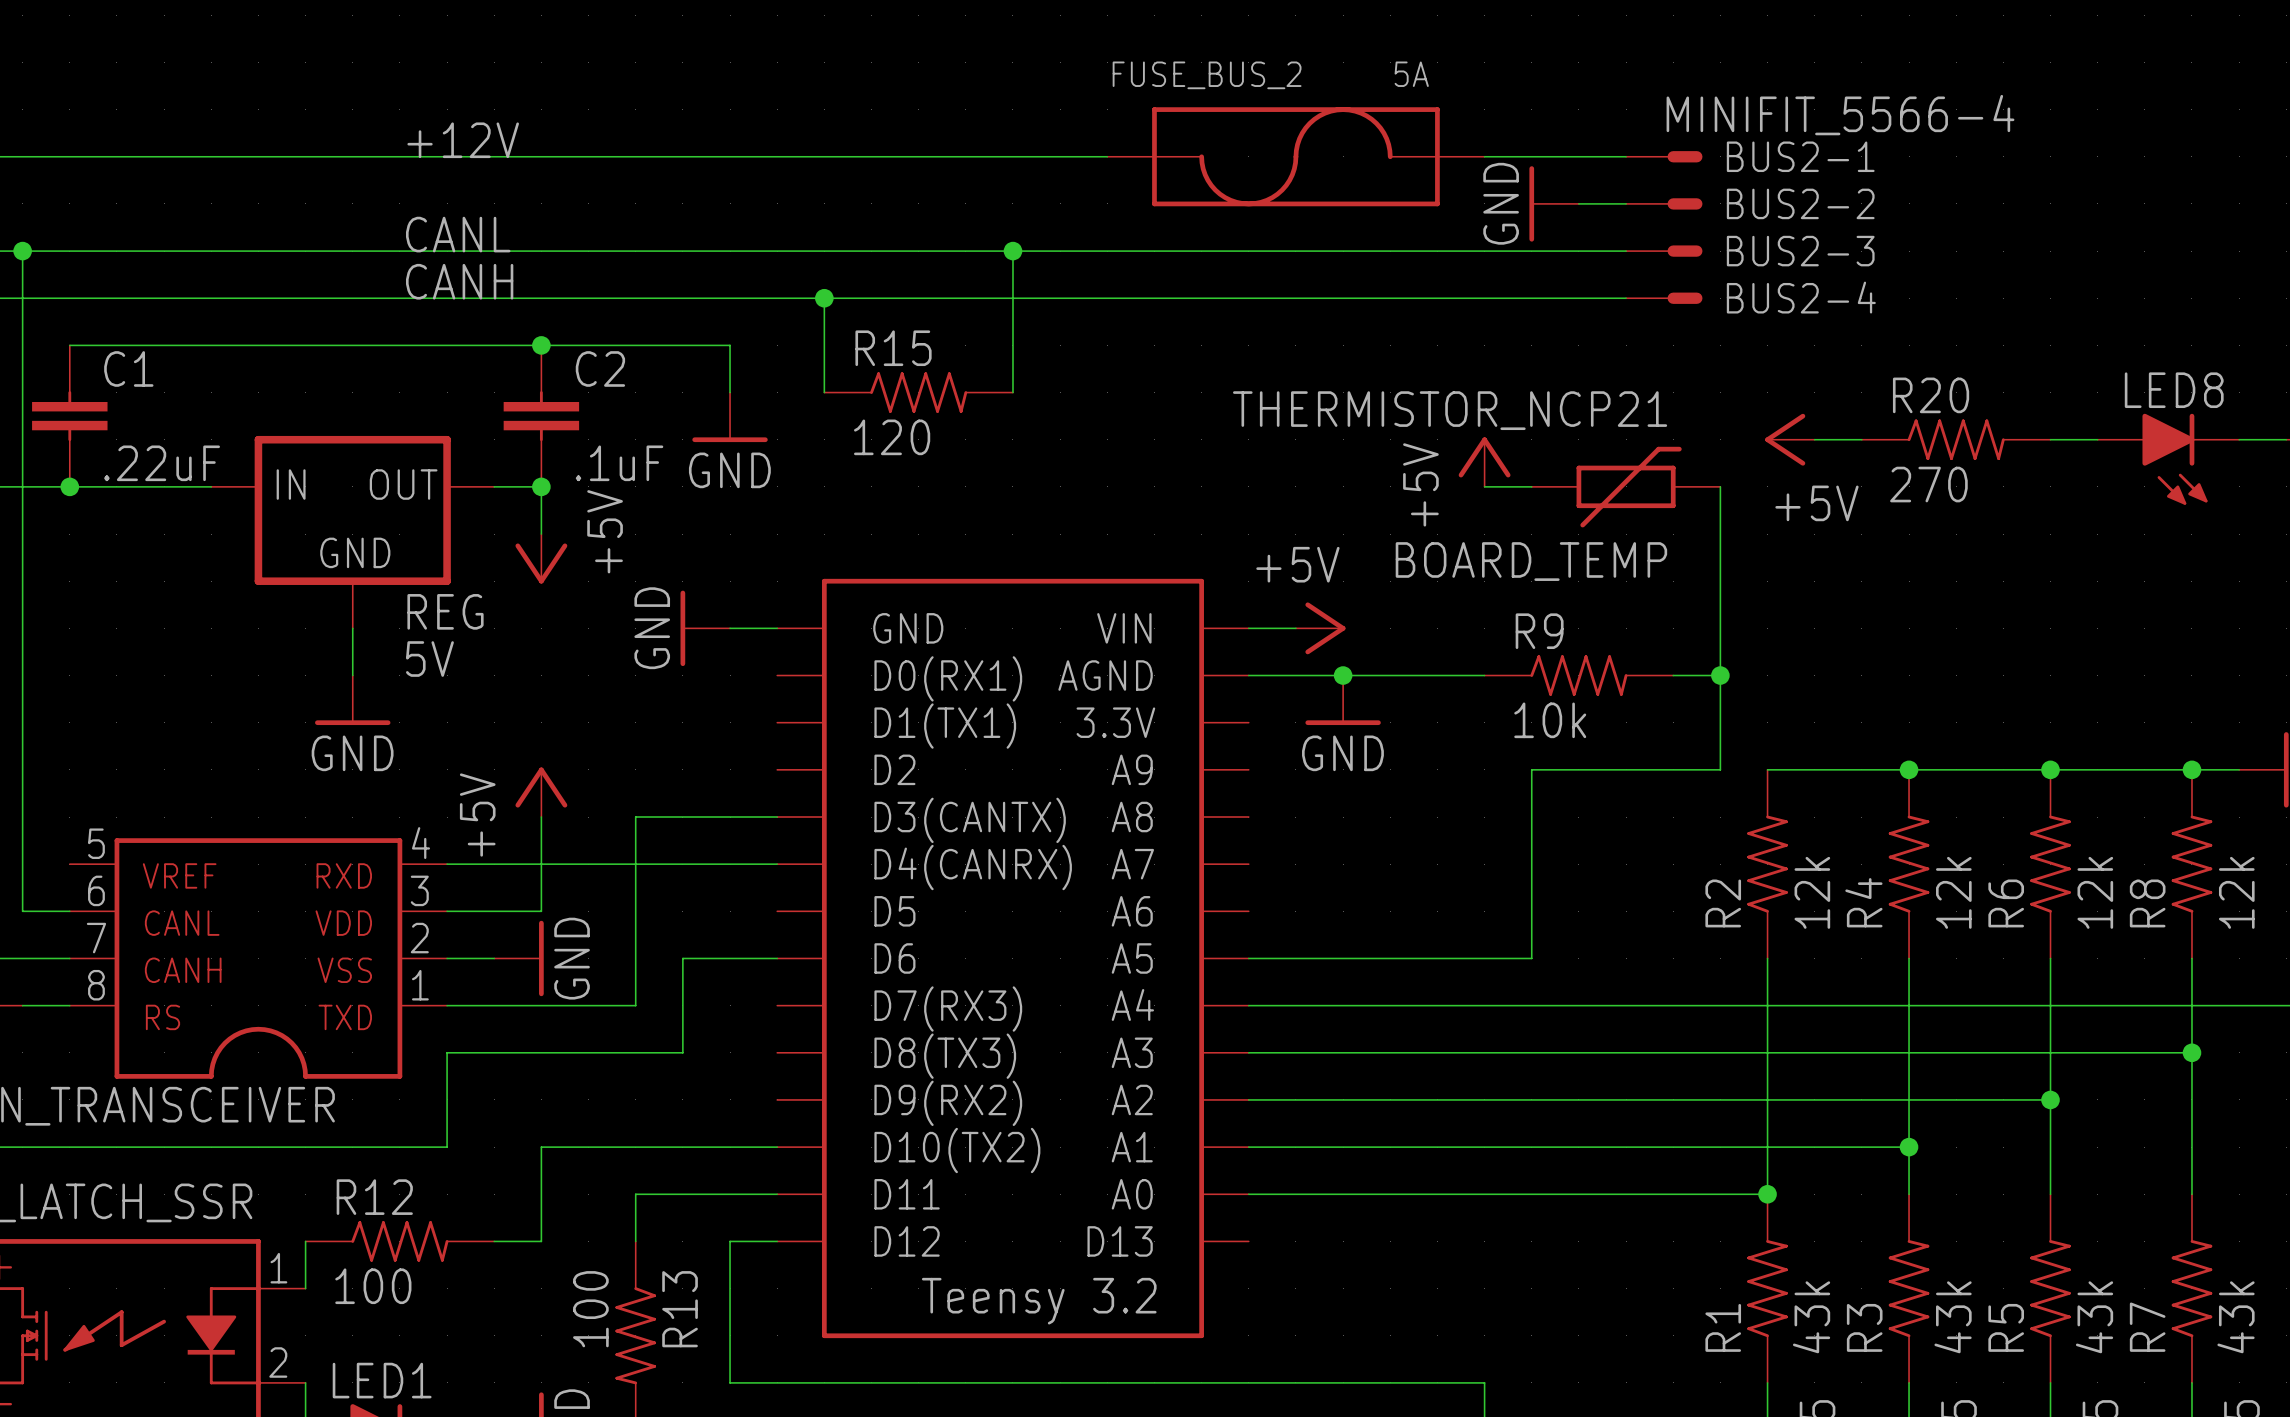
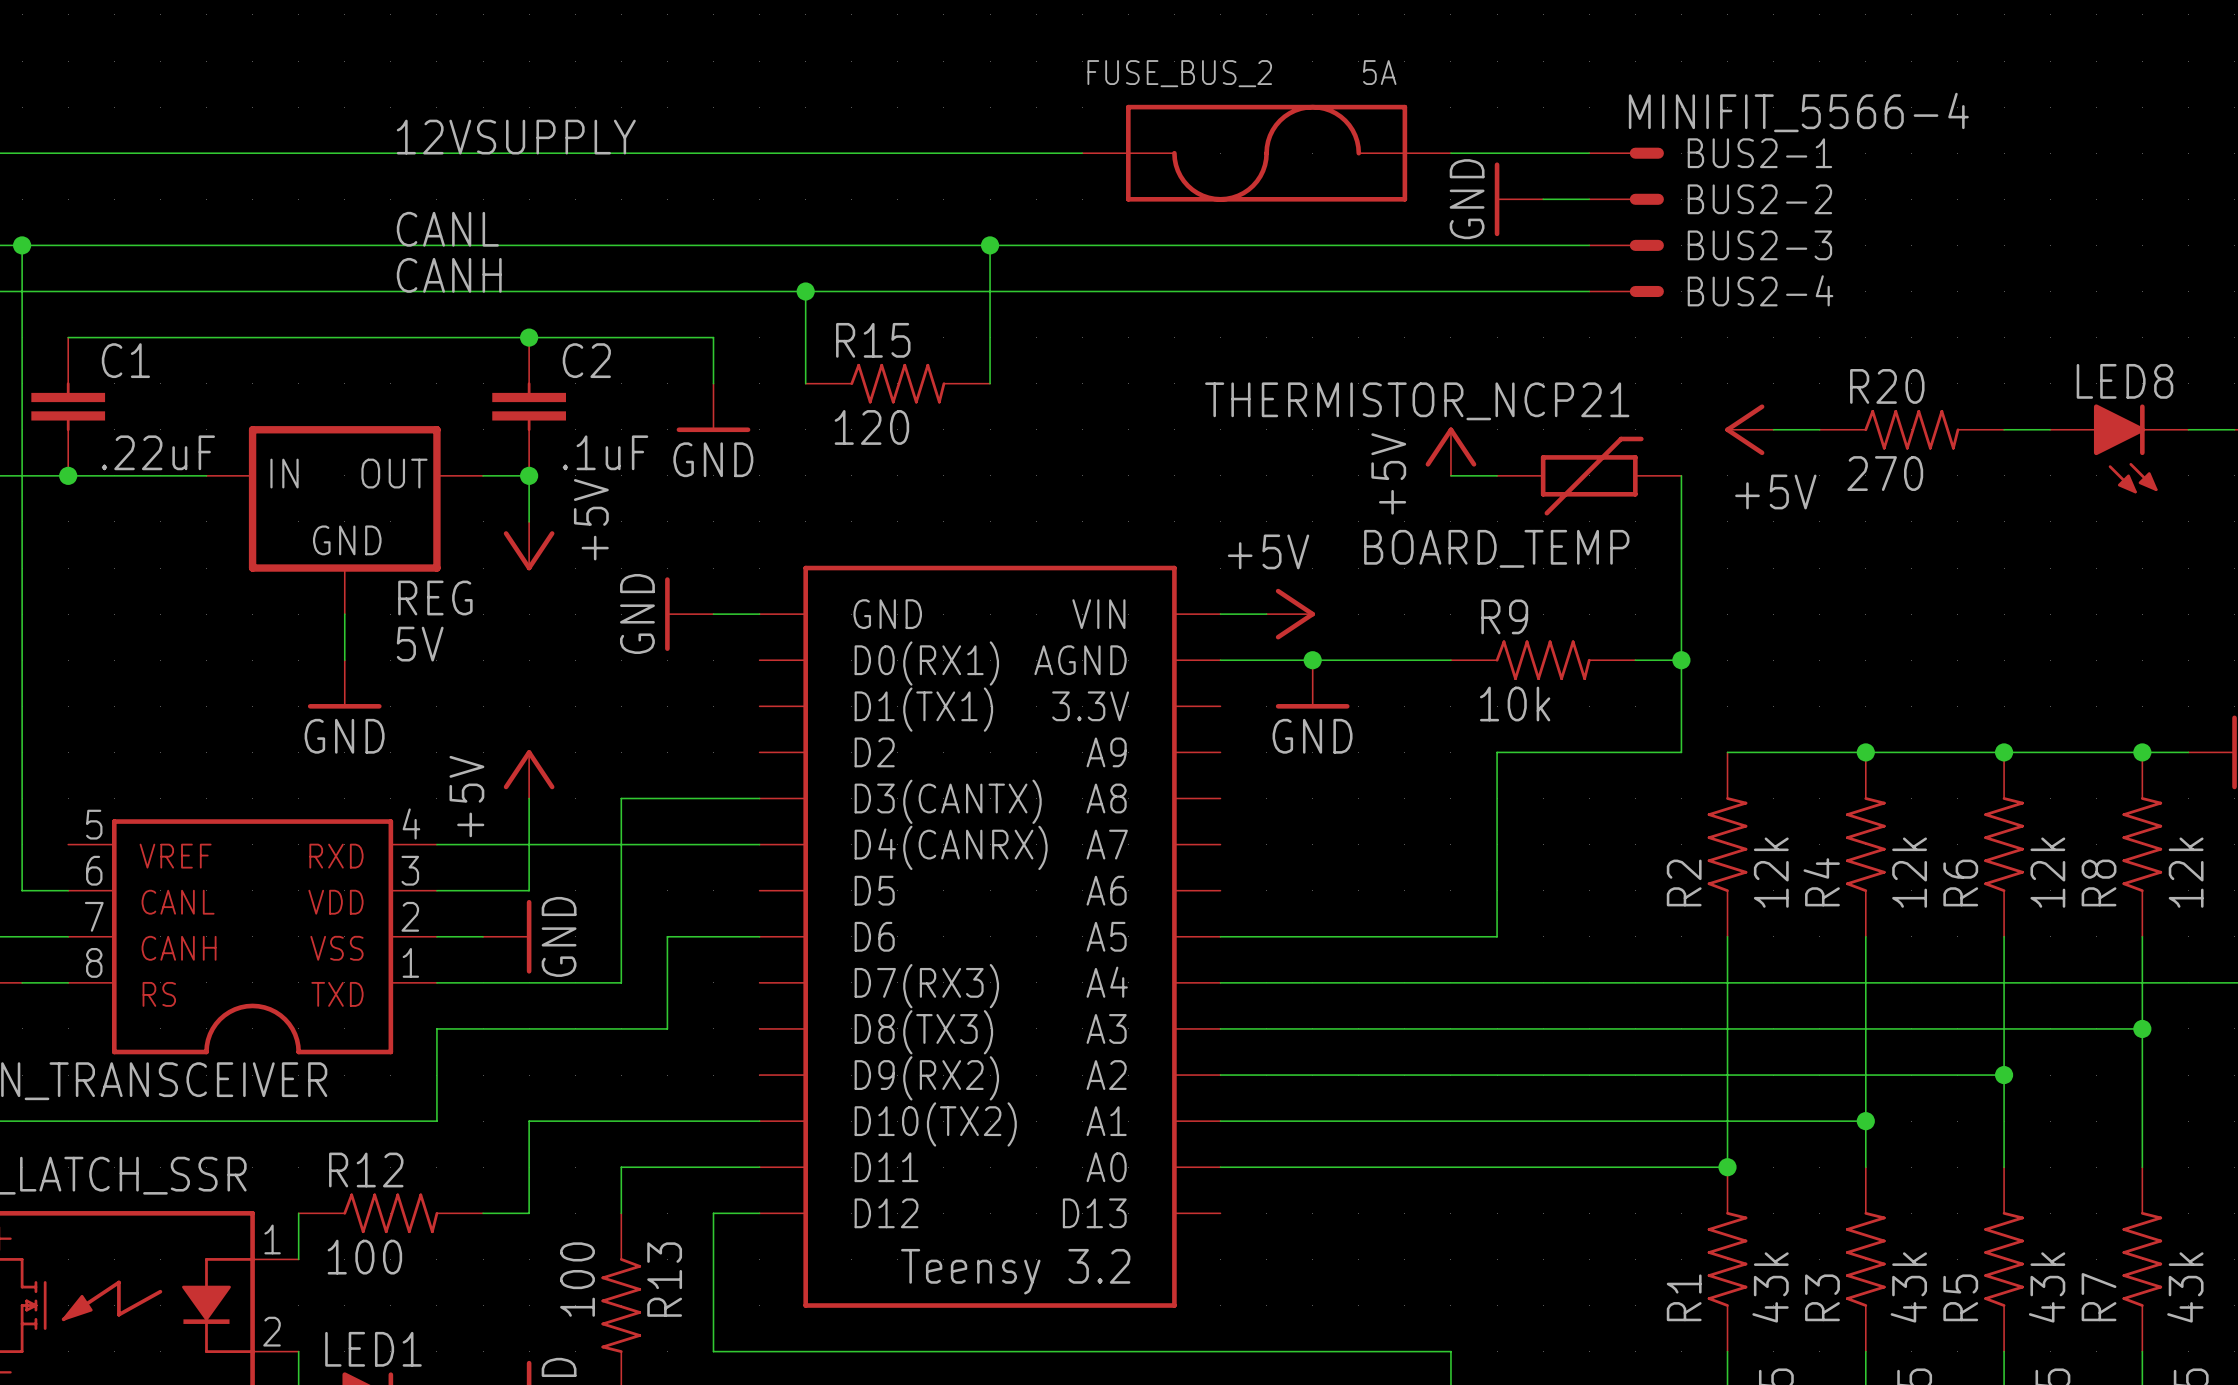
label: +12V (463, 140) -> 12VSUPPLY (516, 137)

